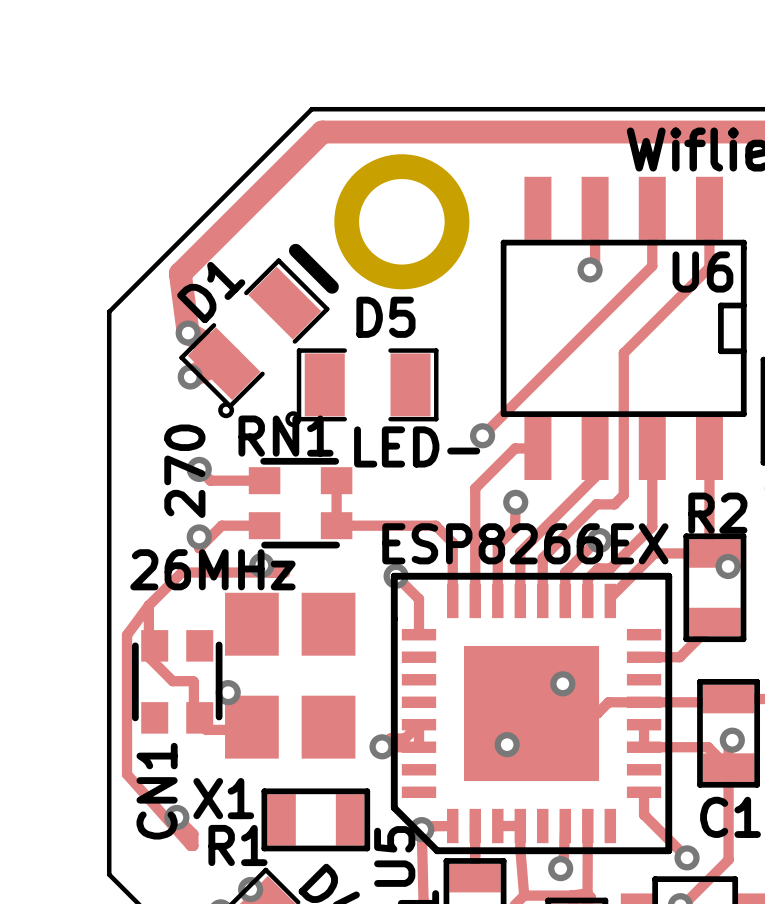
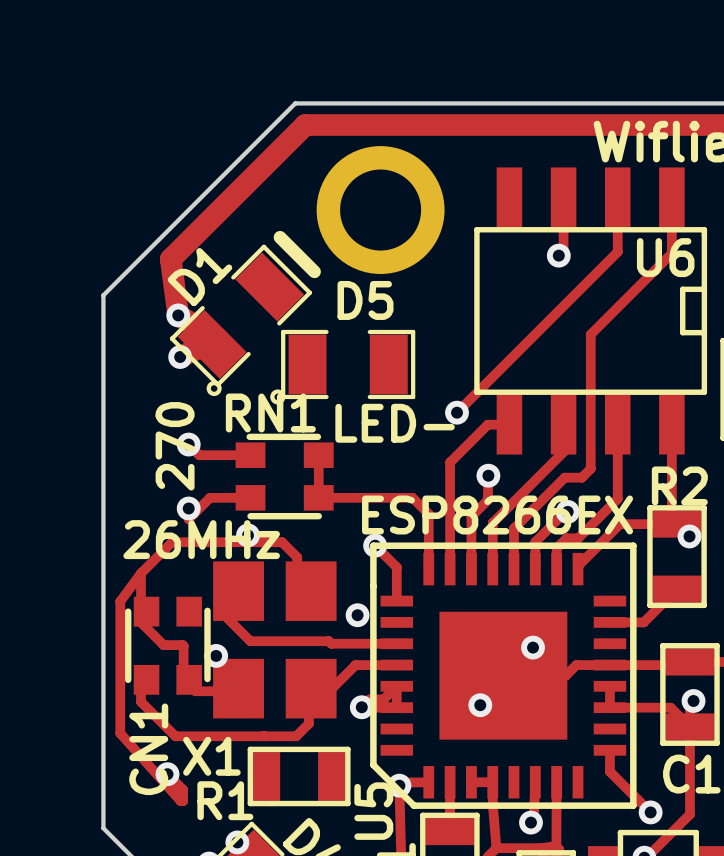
track: none -> (269, 542) (282, 542) (297, 557) (297, 593)
track: none -> (224, 593) (224, 615) (250, 641) (396, 643)
via: none -> (357, 615)
track: none -> (396, 665) (355, 665) (329, 691) (304, 691)
track: none -> (141, 679) (141, 701) (175, 736) (296, 736) (308, 723) (308, 688)

